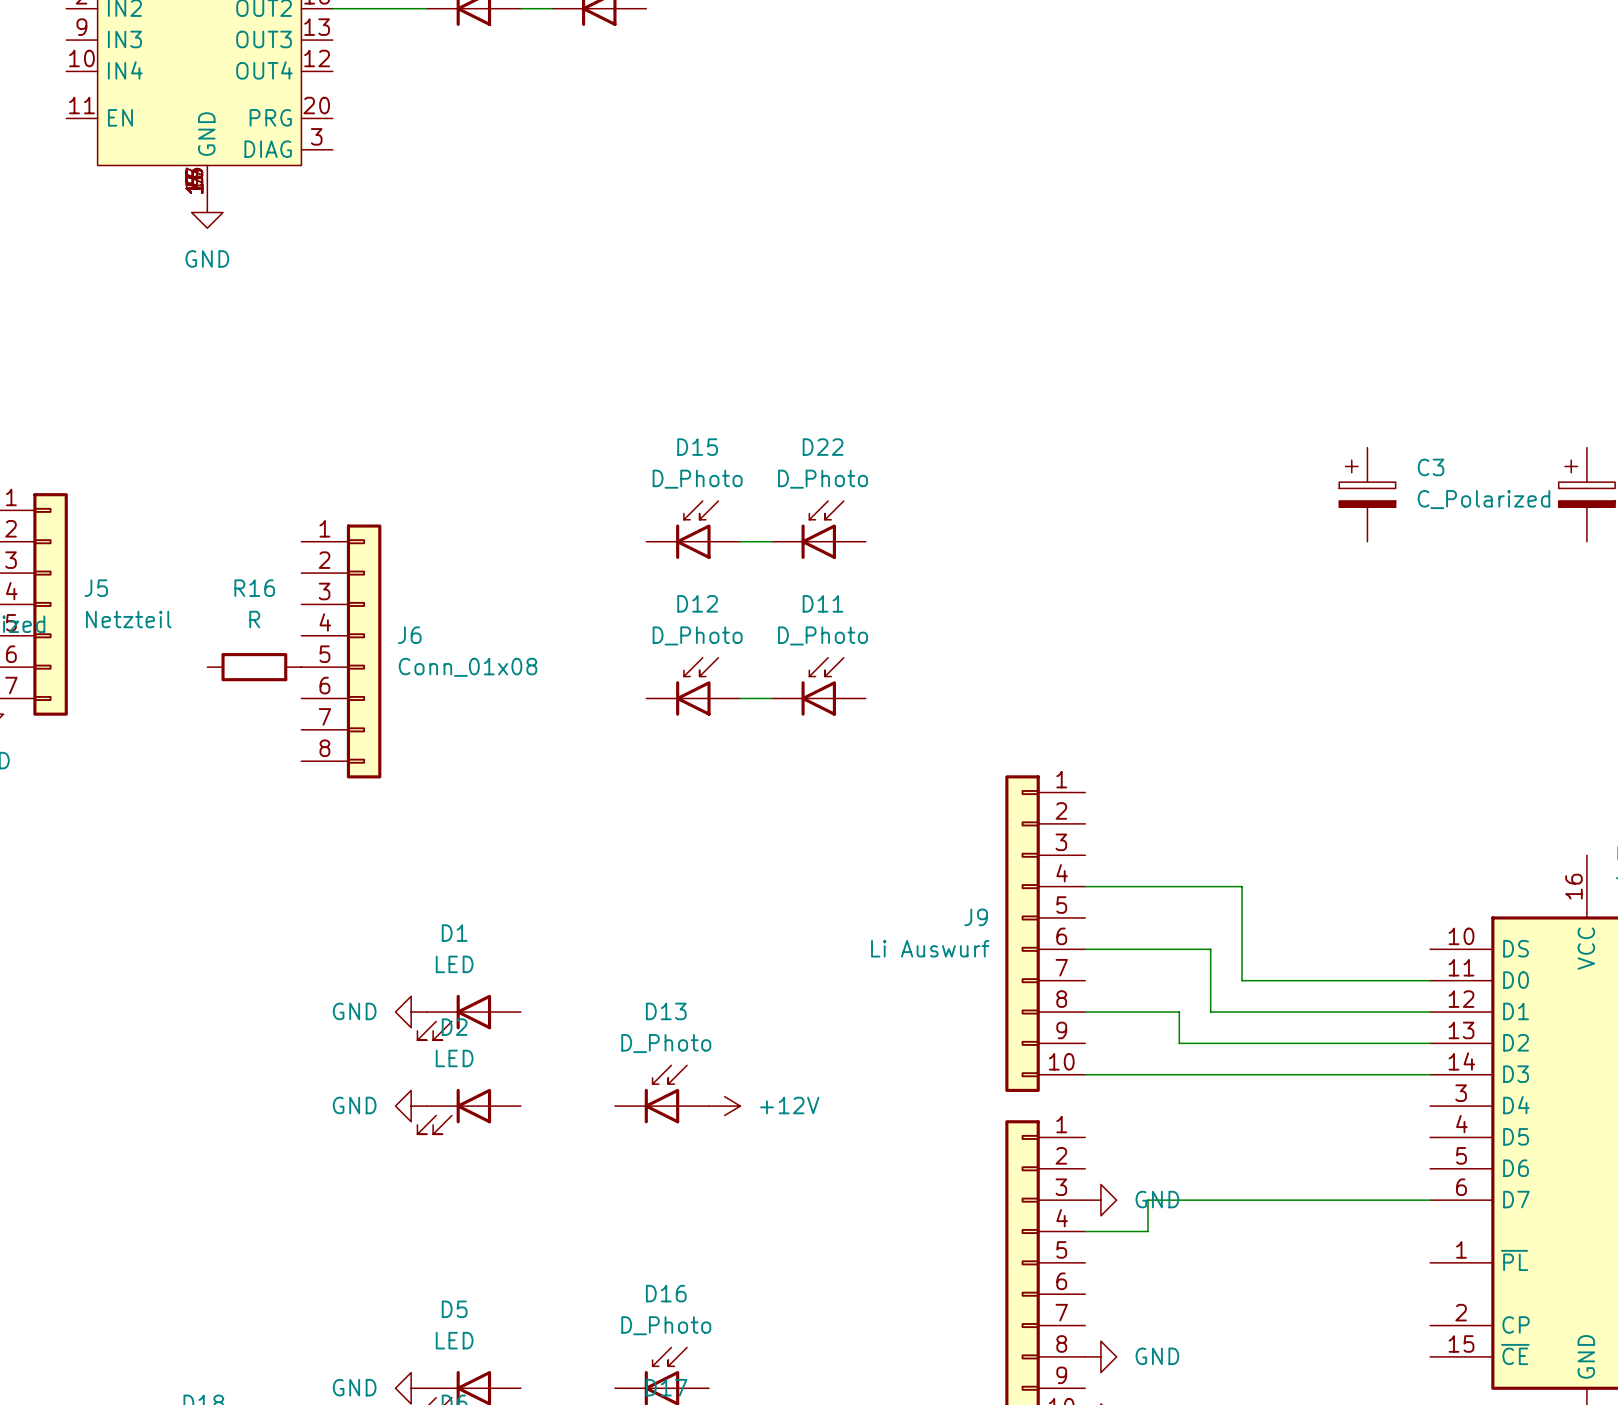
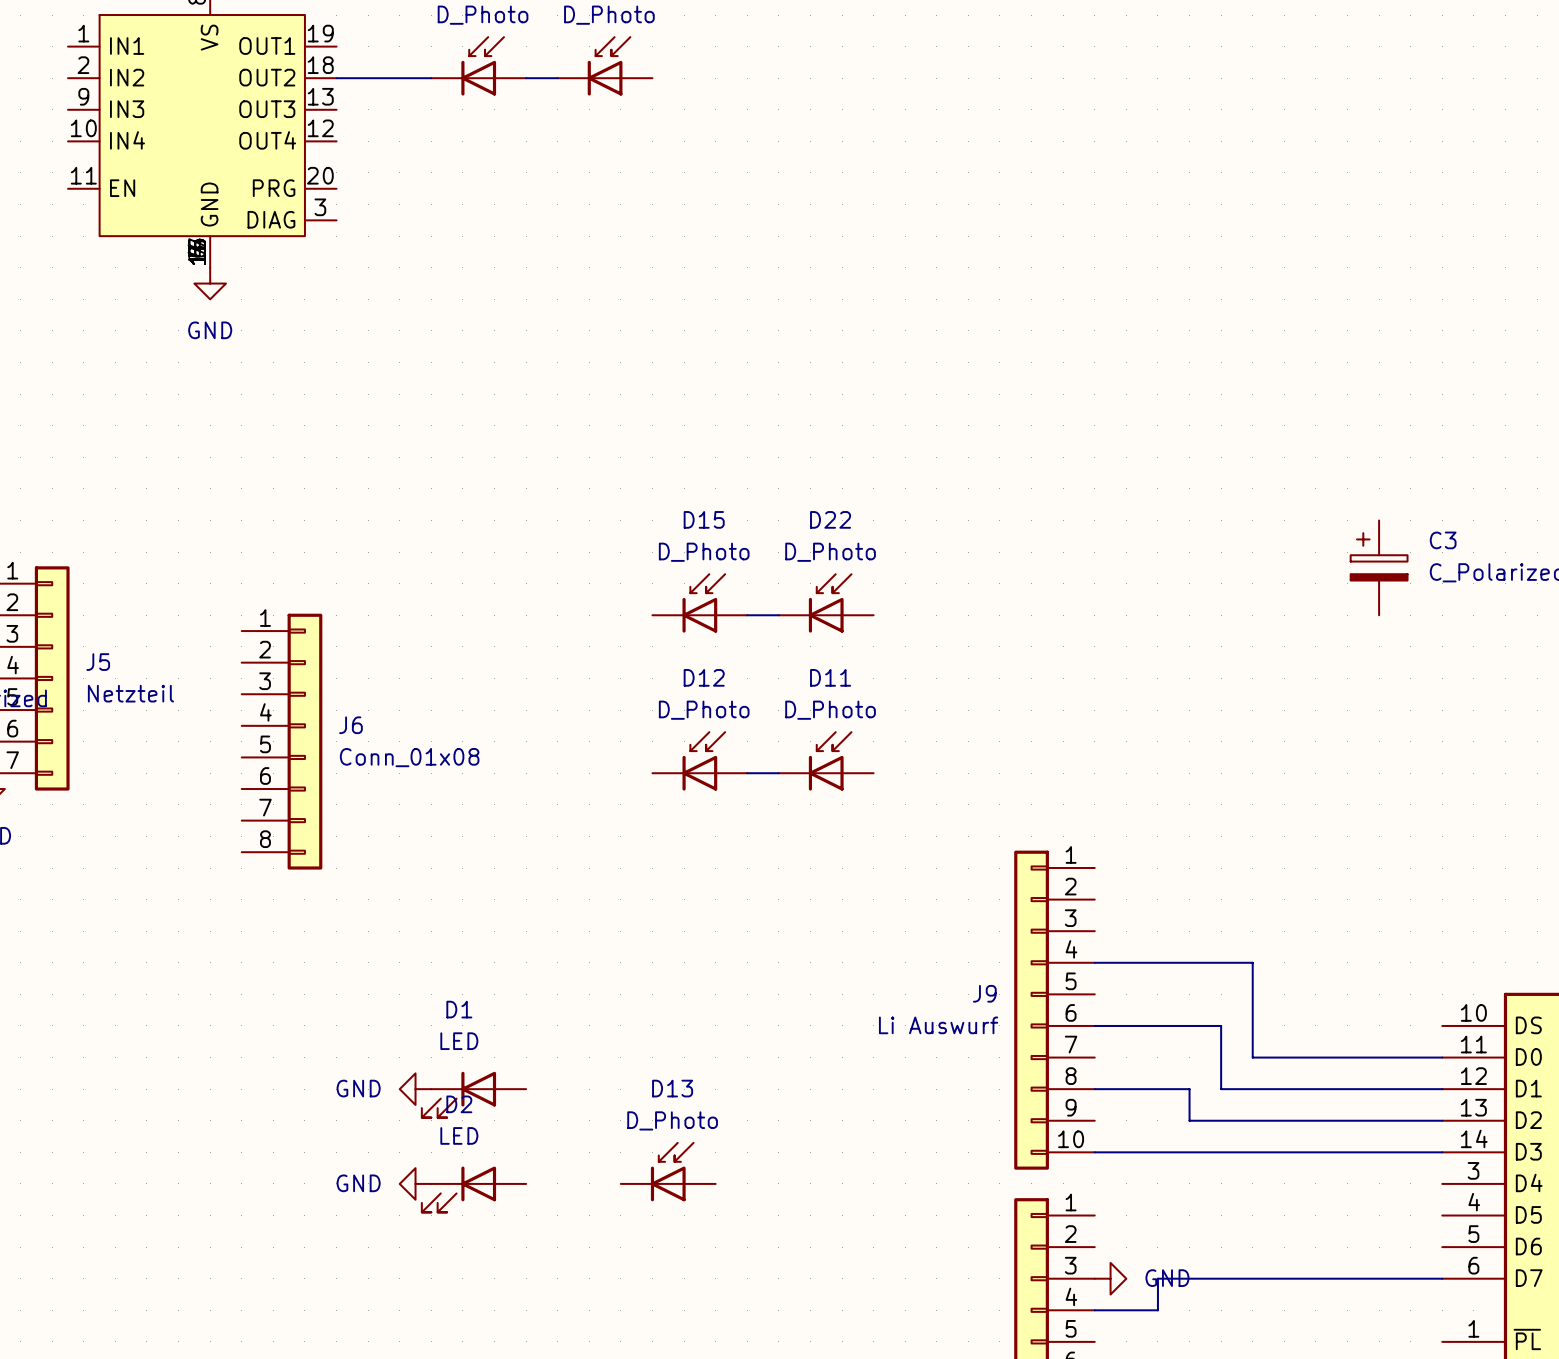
J6 position: (341, 651) -> (282, 741)
R16: R (254, 667) -> none
power symbol: +12V (724, 1106) -> none

